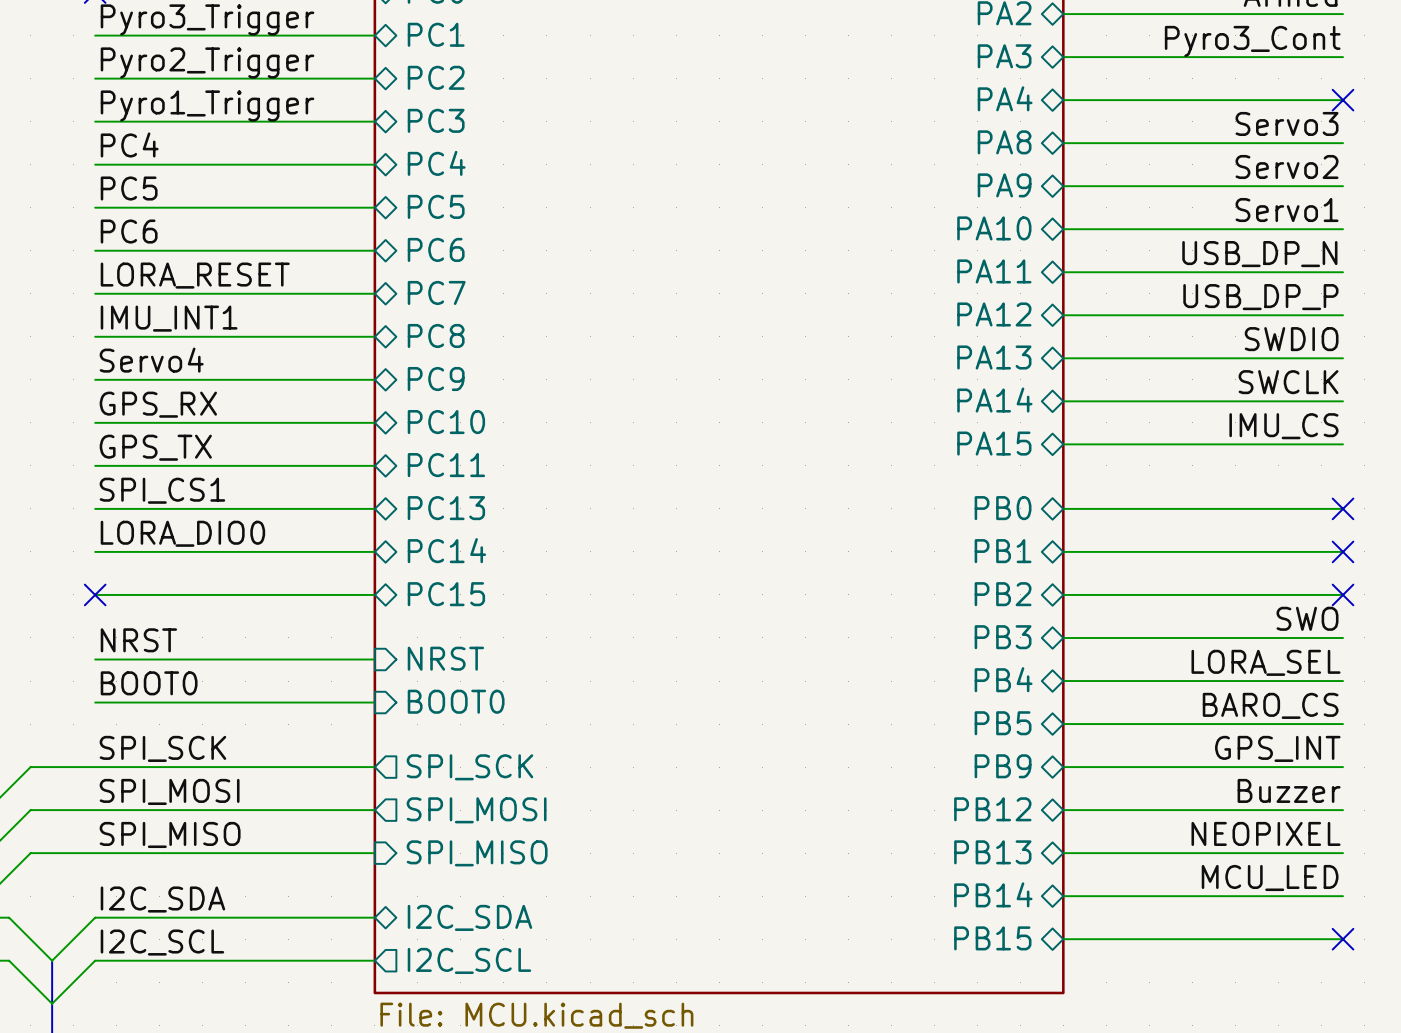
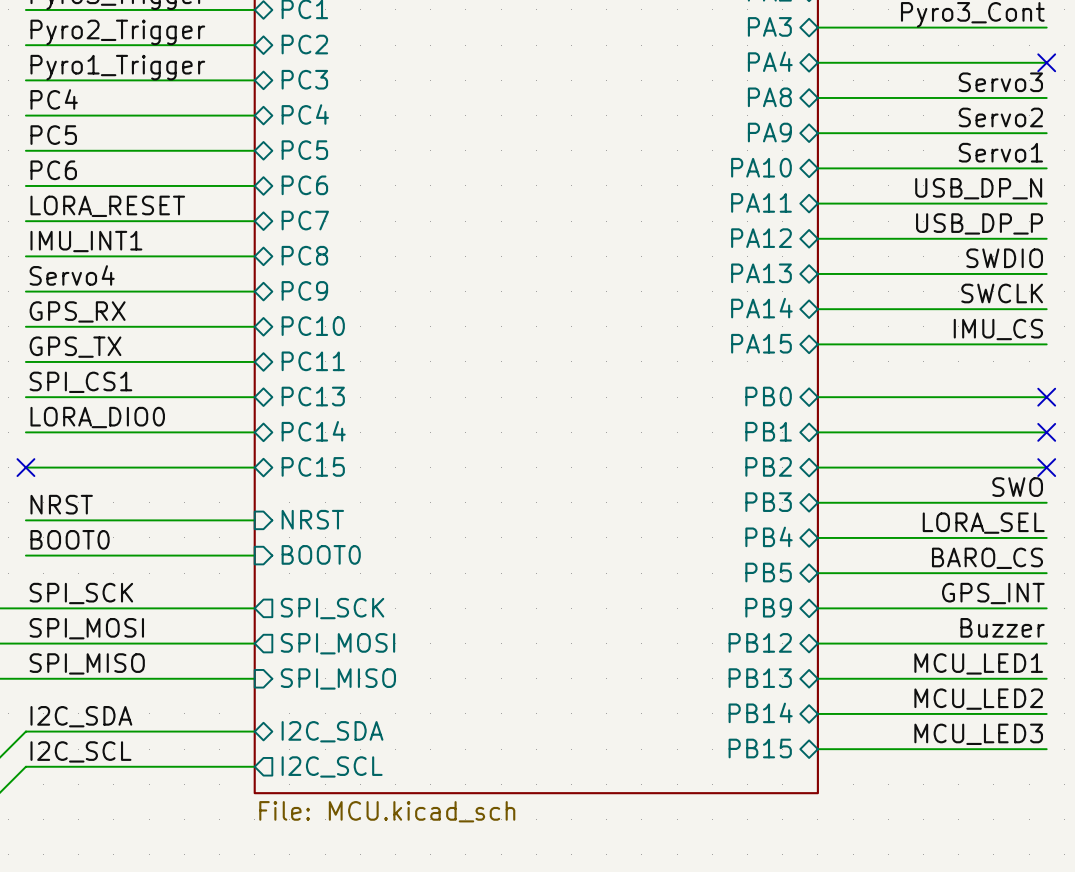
label: NEOPIXEL (1266, 833) -> MCU_LED1 (978, 663)
label: MCU_LED (1270, 877) -> MCU_LED2 (978, 699)
label: none -> MCU_LED3 (978, 734)
no-connect mark: (1343, 939) -> none

